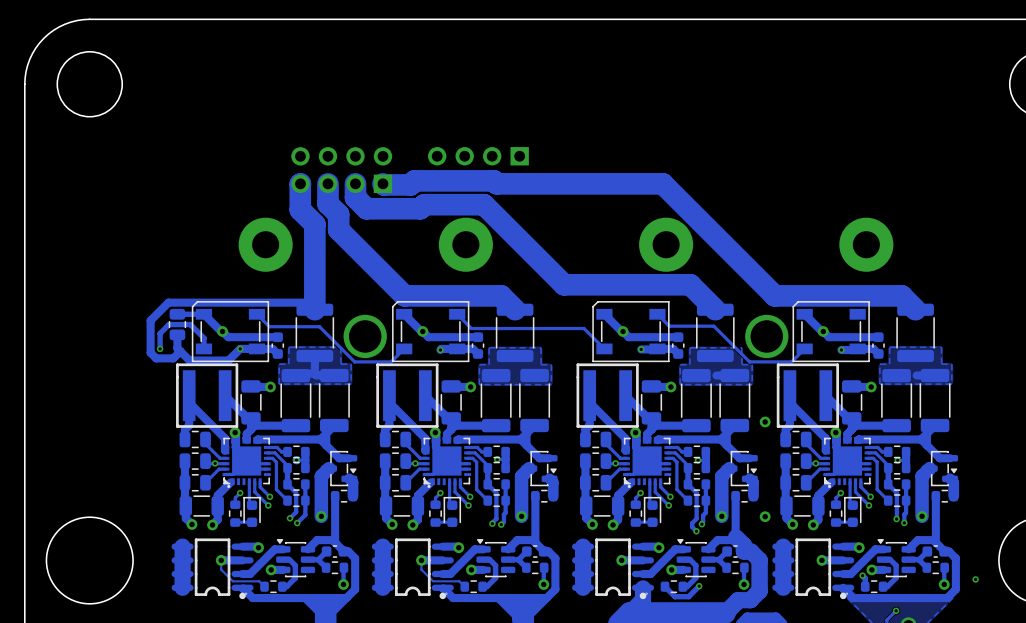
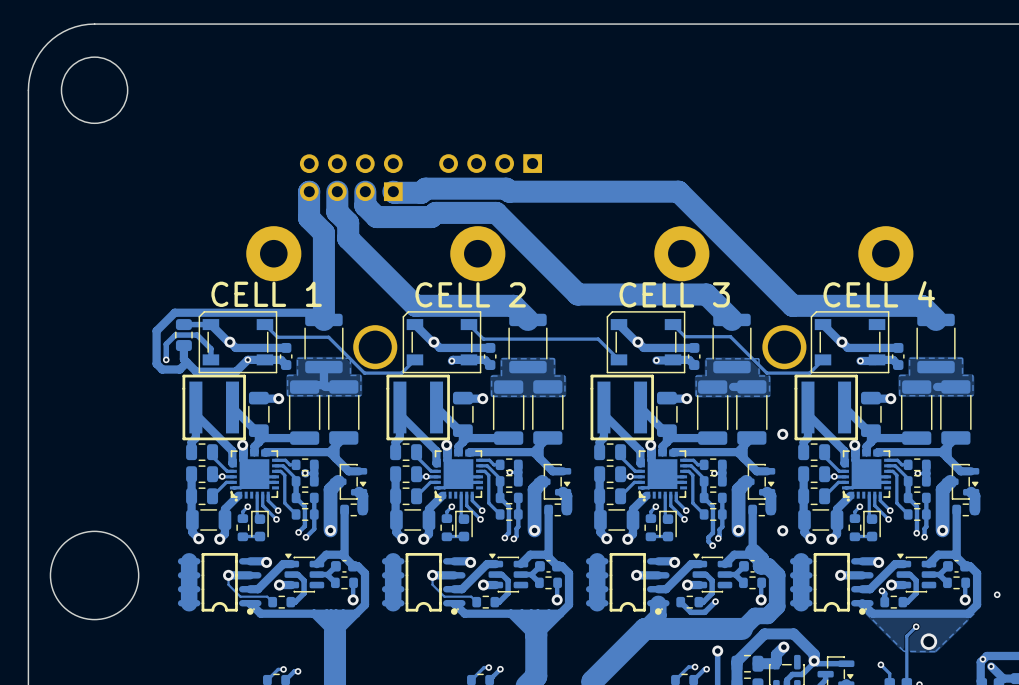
text: none -> CELL 1 (266, 294)
text: none -> CELL 4 (879, 294)
text: none -> CELL 2 (470, 294)
text: none -> CELL 3 (674, 294)

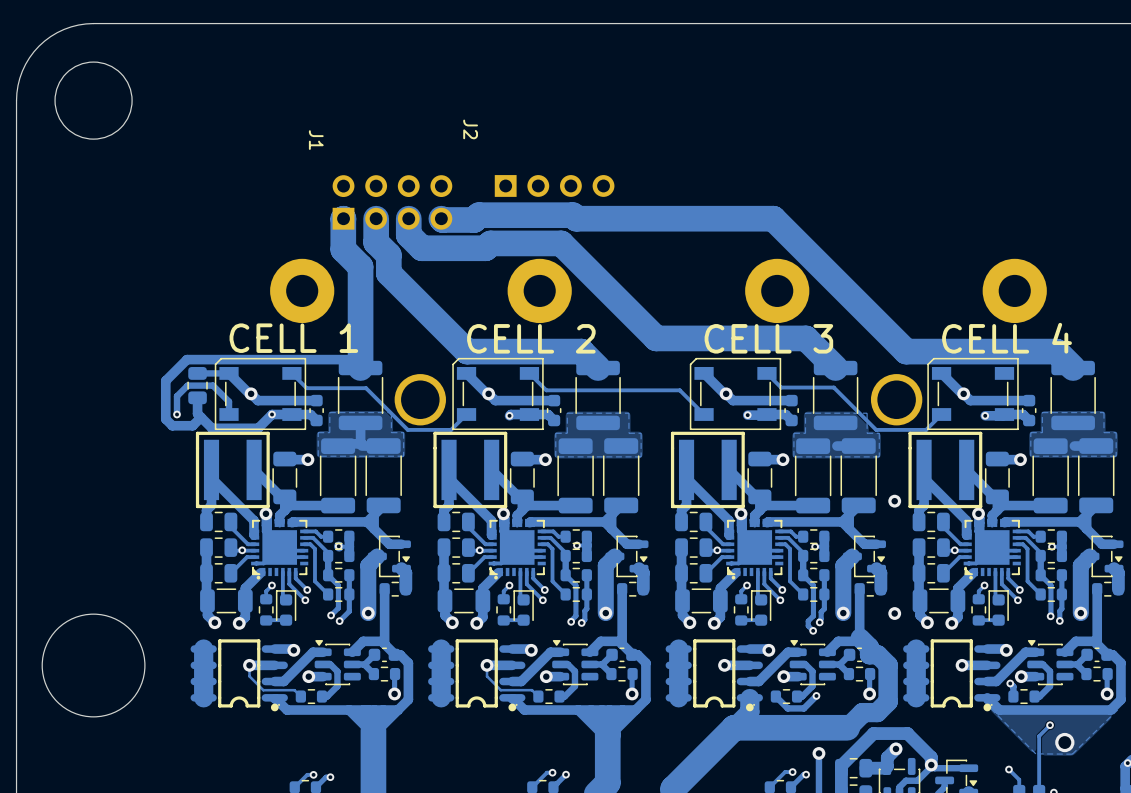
part: (490, 163) -> none
J2: none -> (554, 185)
part: (351, 177) -> none
J1: none -> (392, 202)

